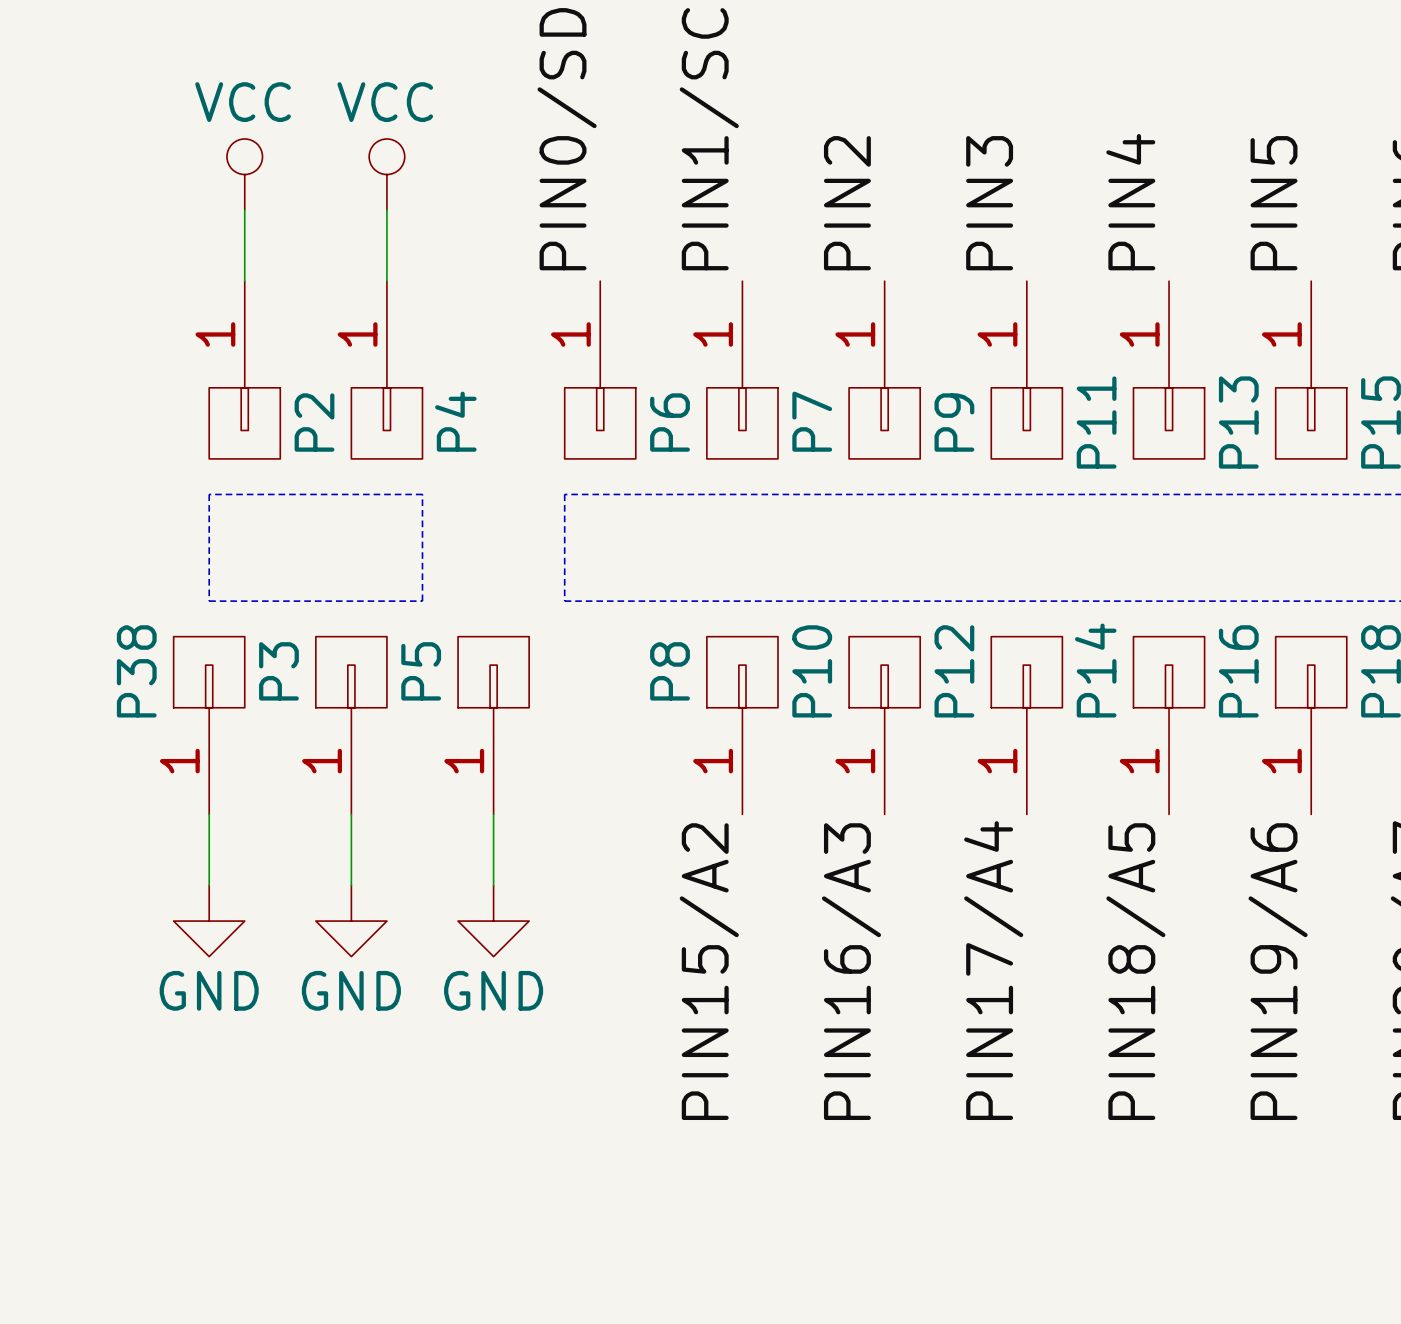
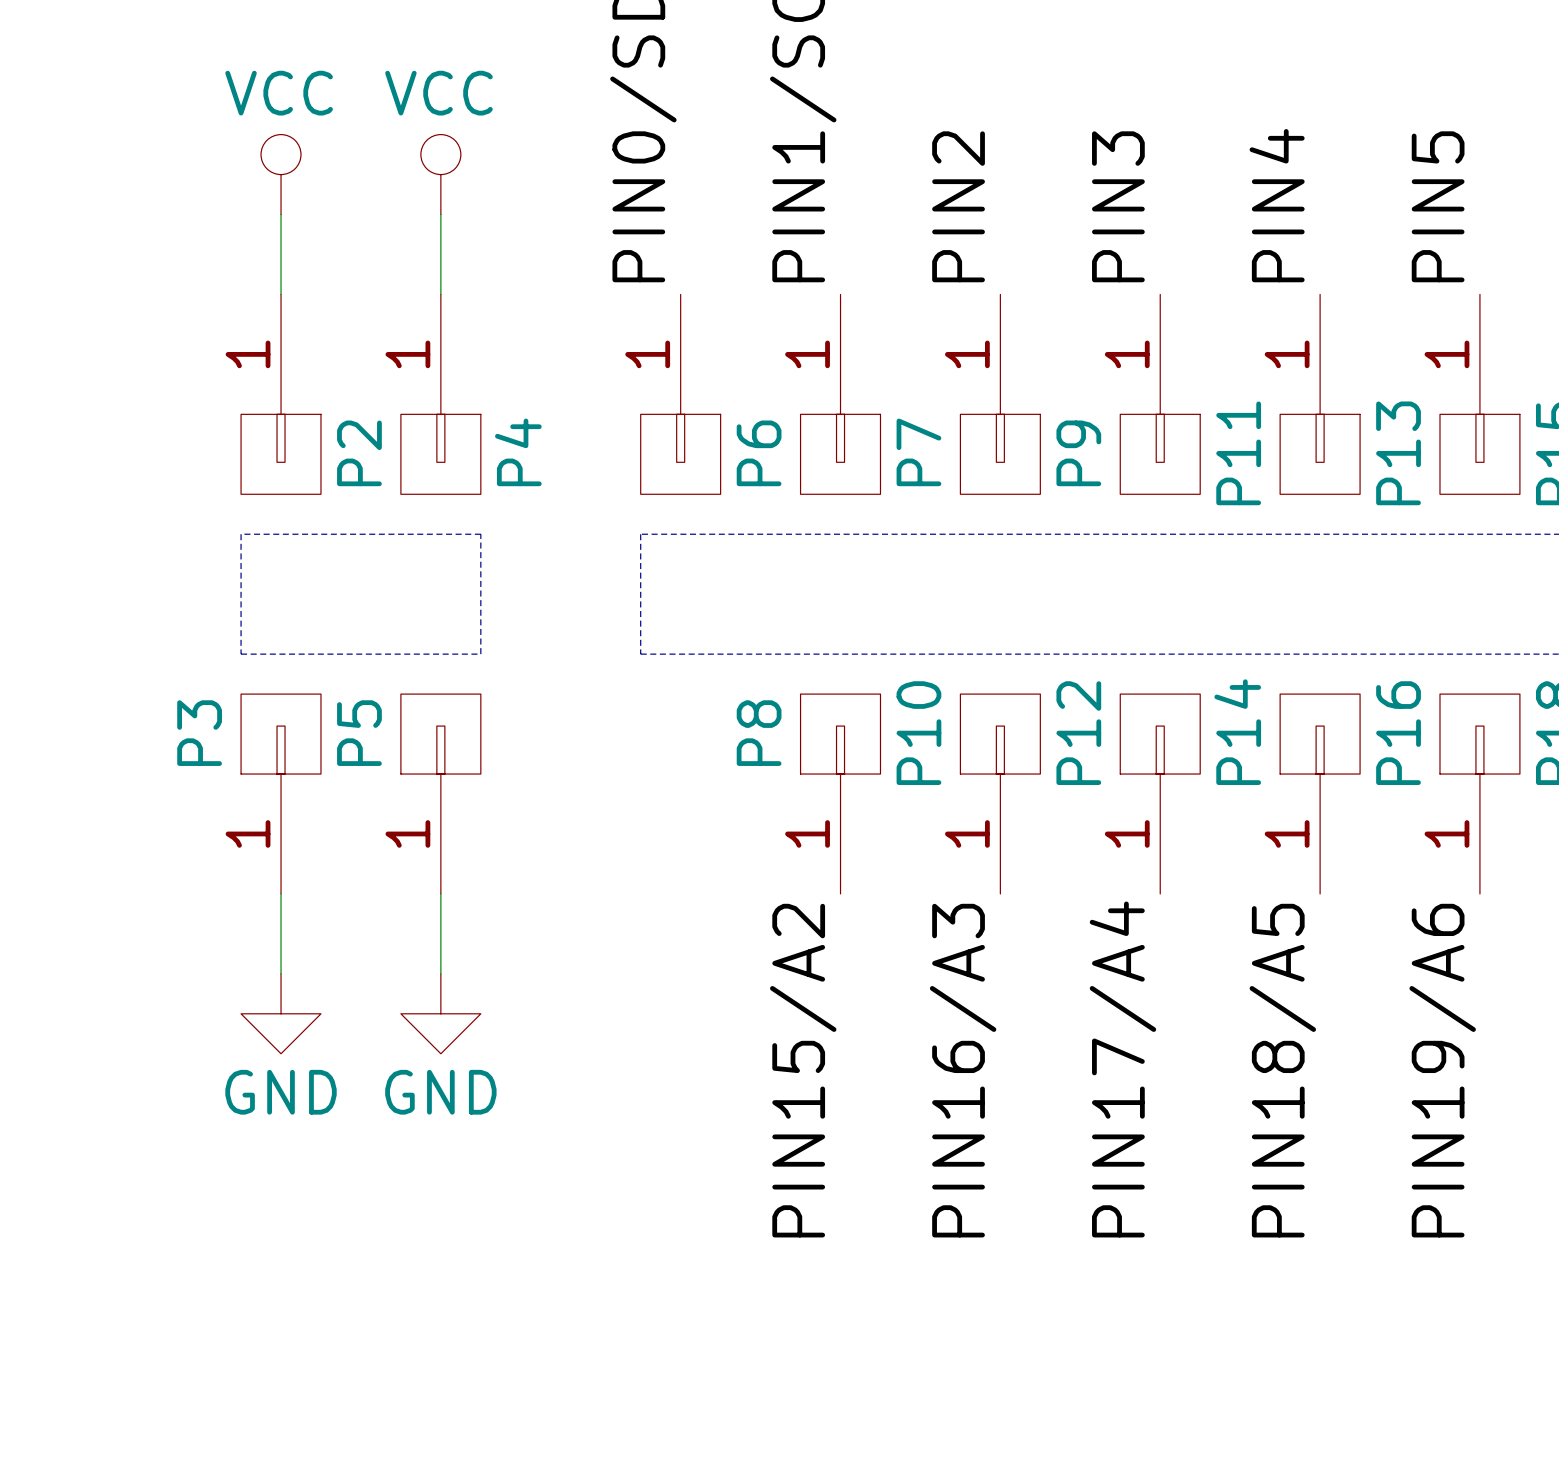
P38: (209, 725) -> none
P3 position: (351, 725) -> (281, 794)
P5 position: (493, 725) -> (440, 794)
wire: (209, 814) (209, 885) -> (281, 893) (281, 973)
wire: (351, 814) (351, 885) -> (440, 893) (440, 973)
wire: (493, 814) (493, 885) -> none
power symbol position: GND (209, 921) -> GND (281, 1013)
power symbol position: GND (351, 921) -> GND (440, 1013)
power symbol: GND (493, 921) -> none

